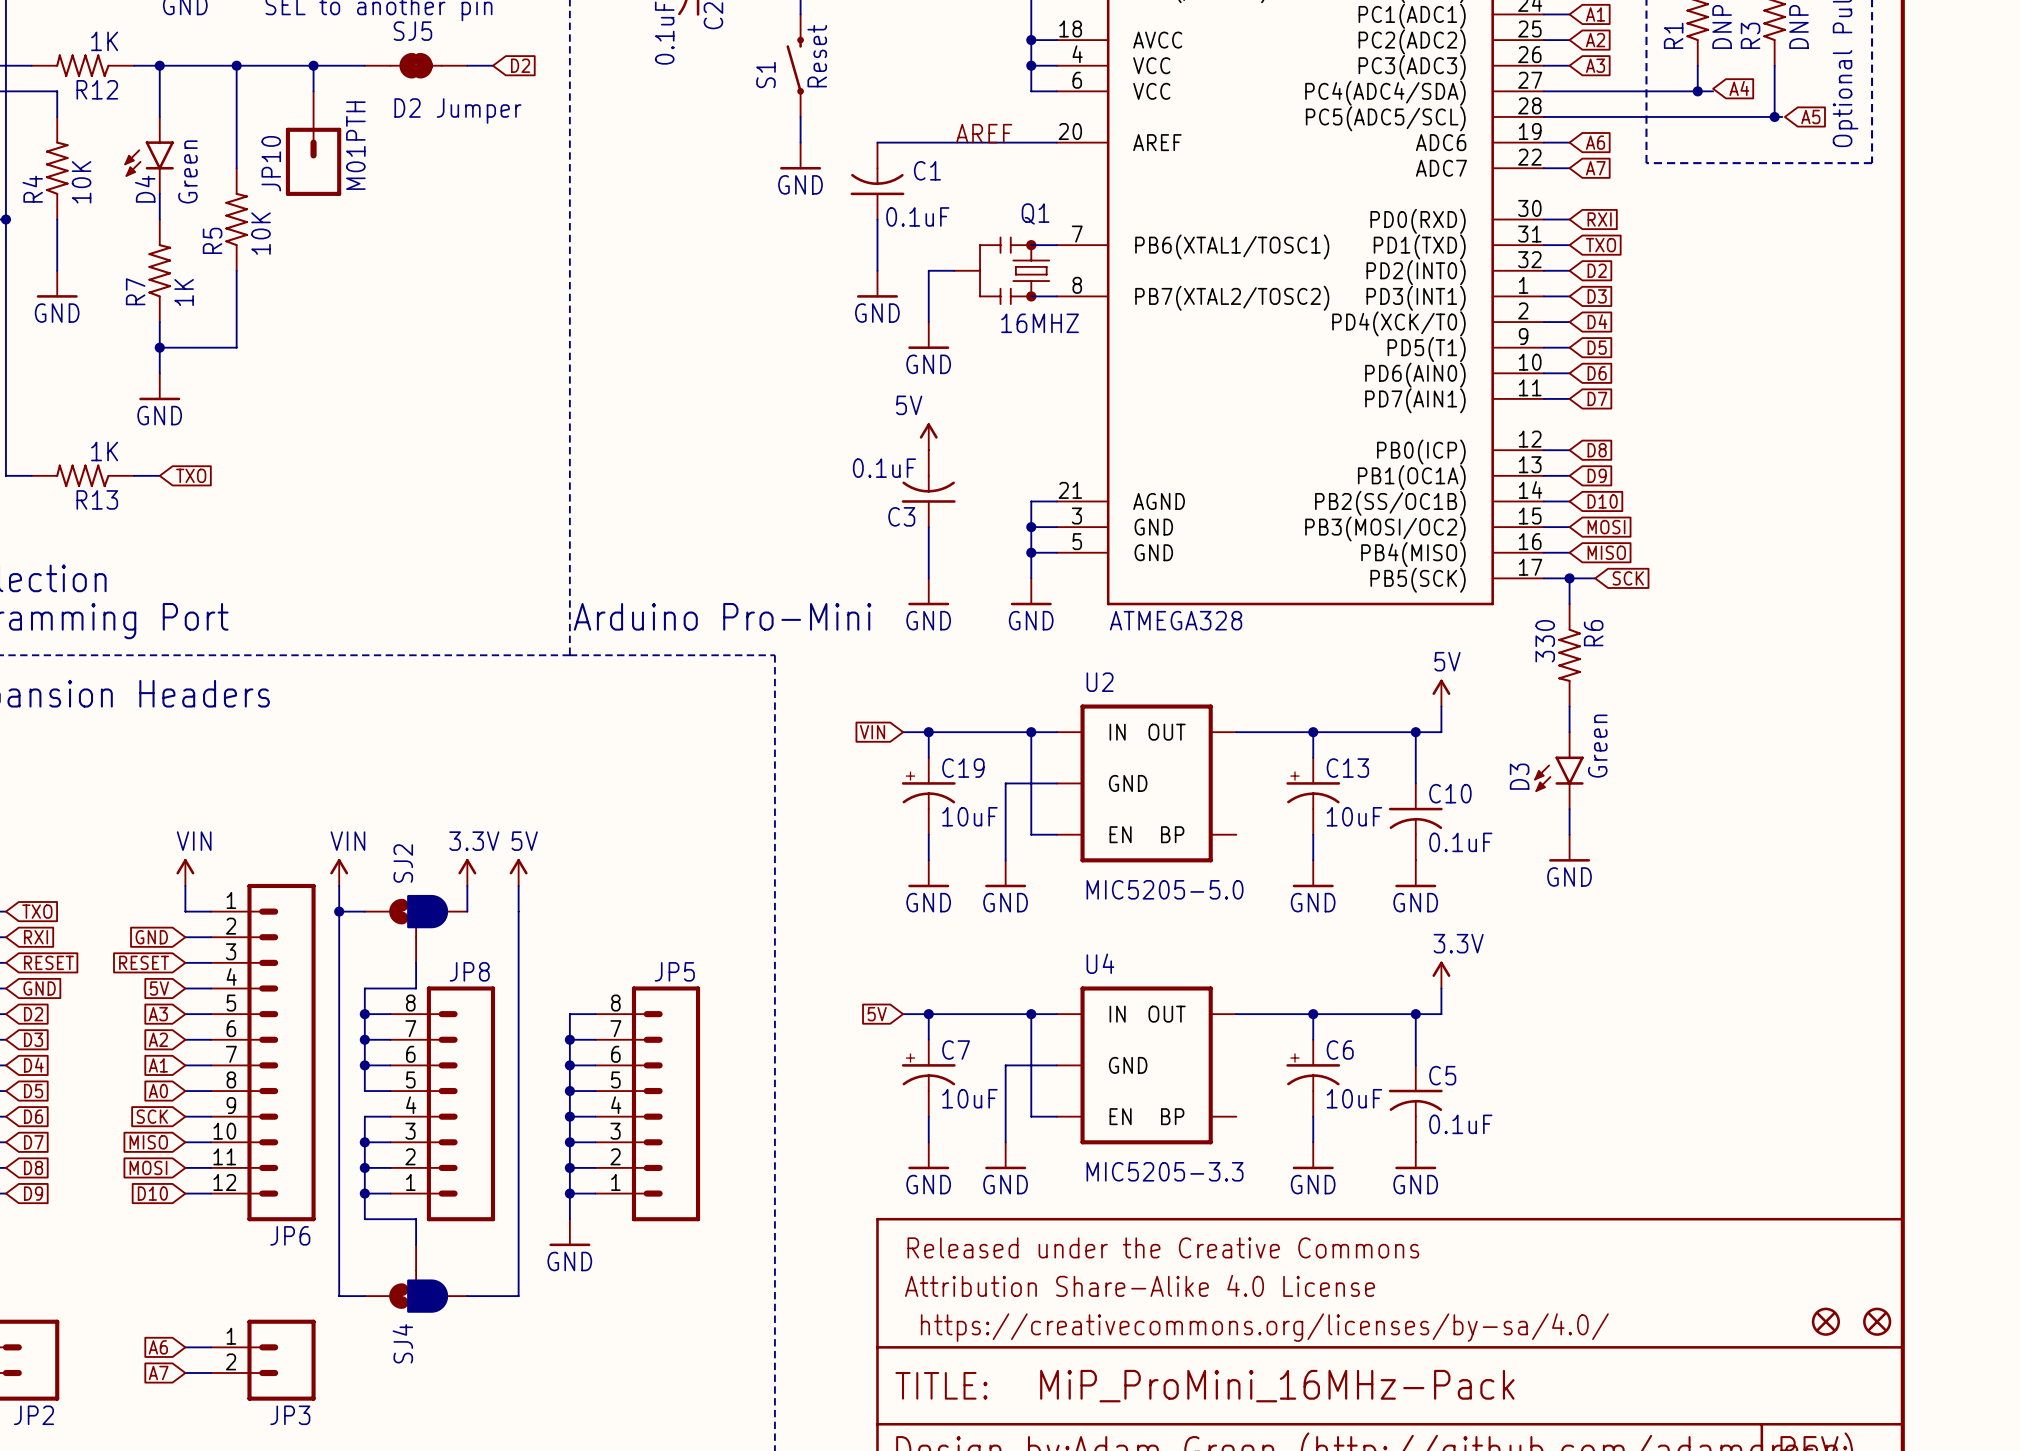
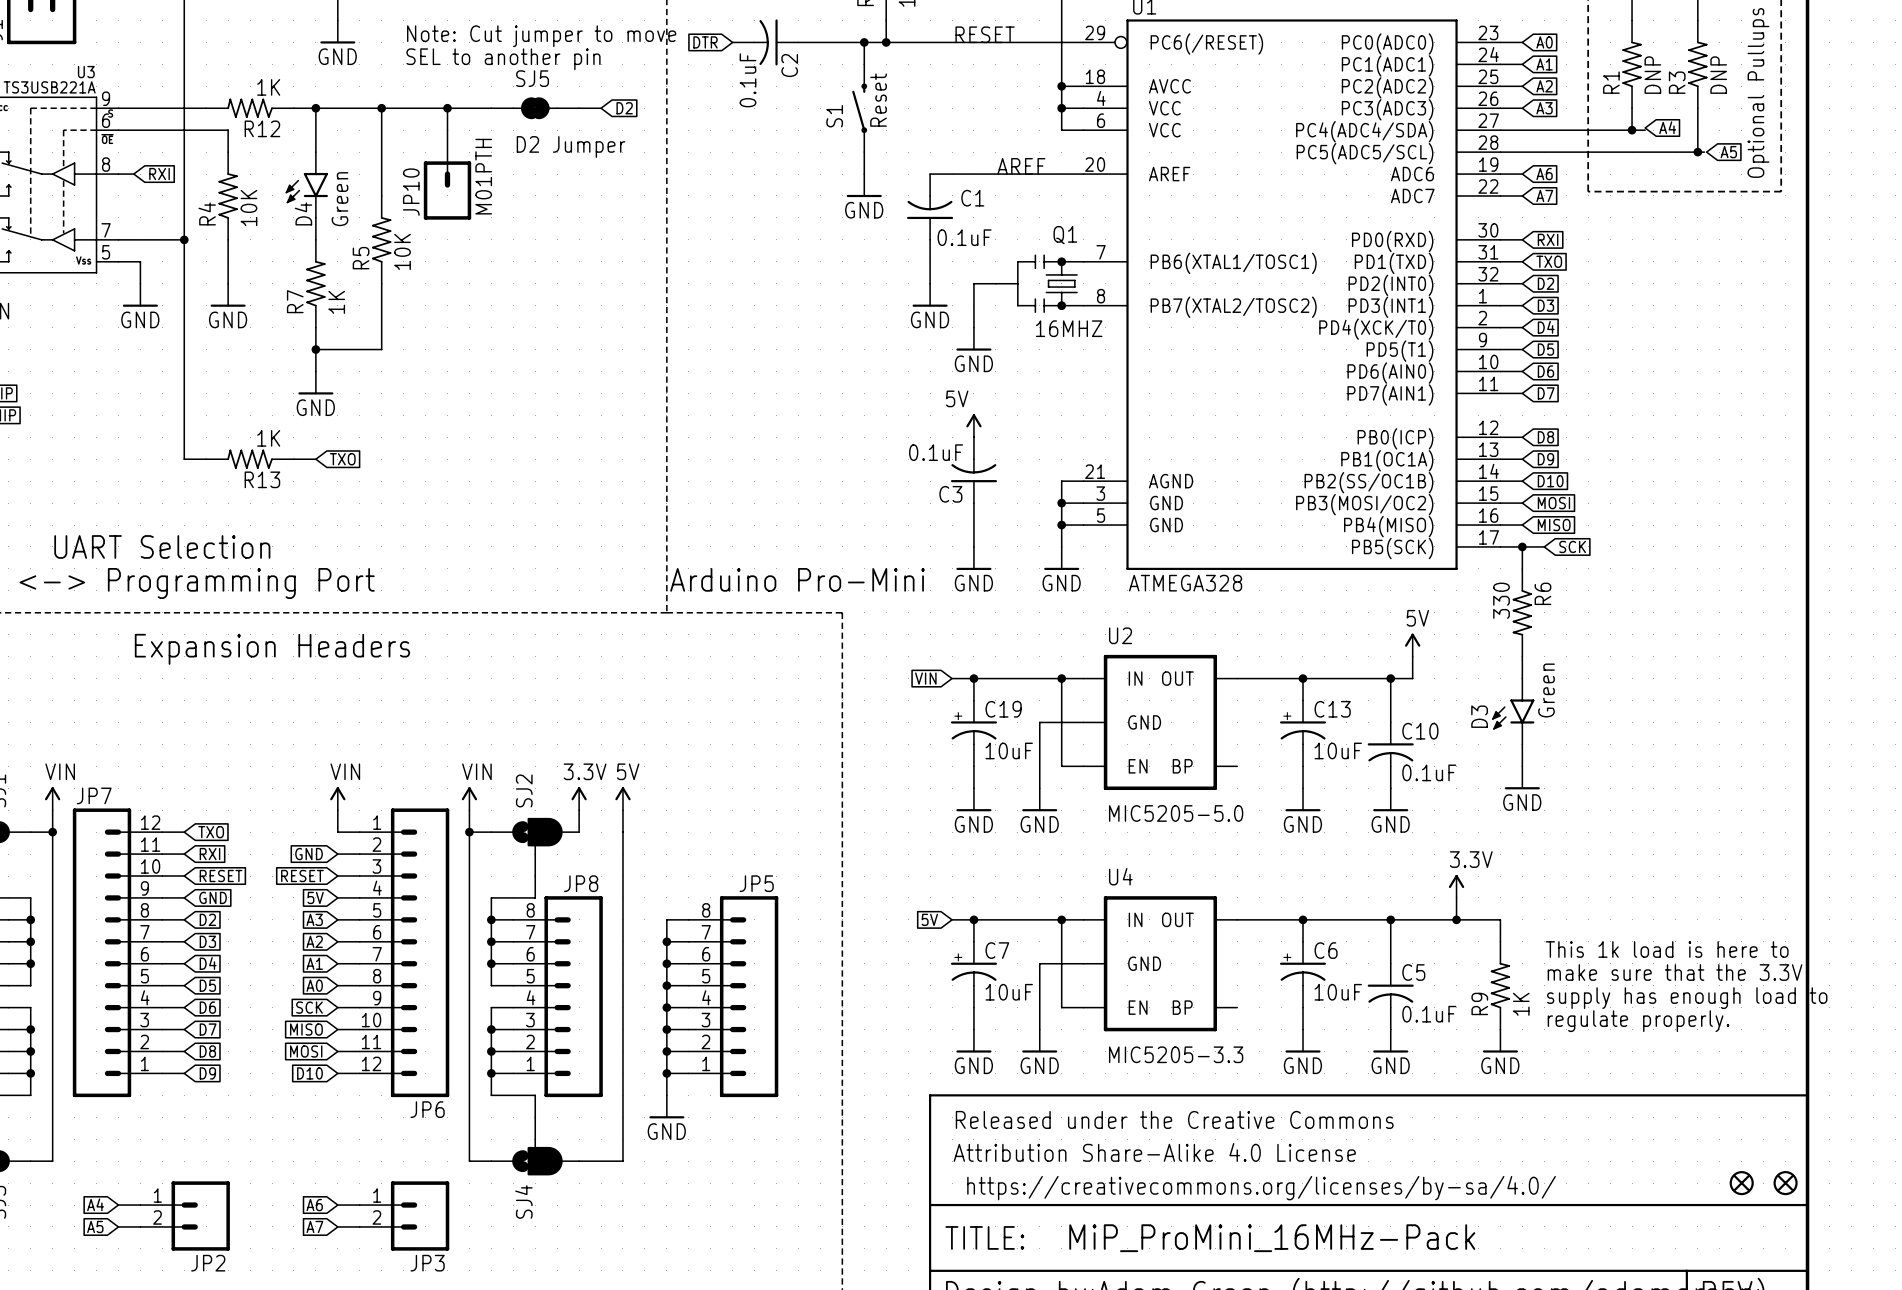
power symbol position: 3.3V (1441, 975) -> 3.3V (1456, 886)
wire: (1441, 988) (1441, 1014) -> (1500, 941) (1500, 919) (1412, 919)
wire: none -> (1456, 897) (1456, 919)
junction: none -> (1456, 919)
text: none -> This 1k load is here to (1667, 949)
text: none -> make sure that the 3.3V (1675, 972)
R9: none -> 1K (1500, 985)
text: none -> supply has enough load to (1687, 998)
text: none -> regulate properly. (1638, 1021)
power symbol: none -> GND (1500, 1041)

